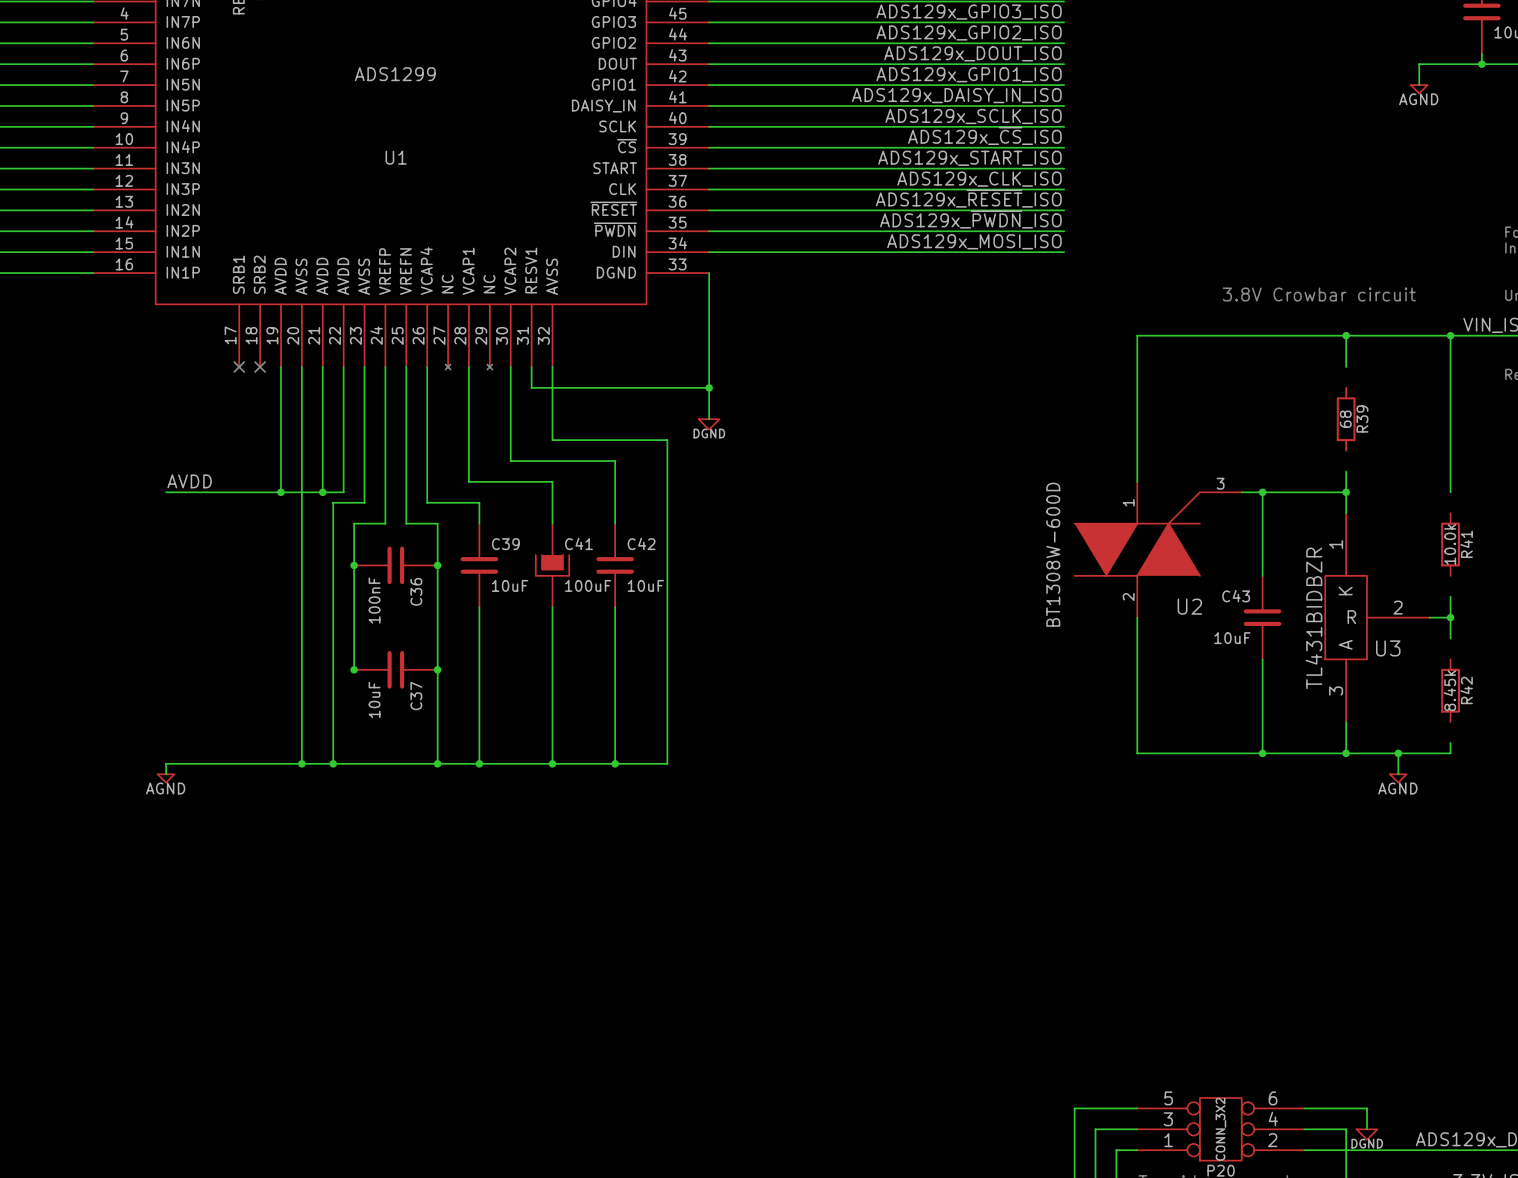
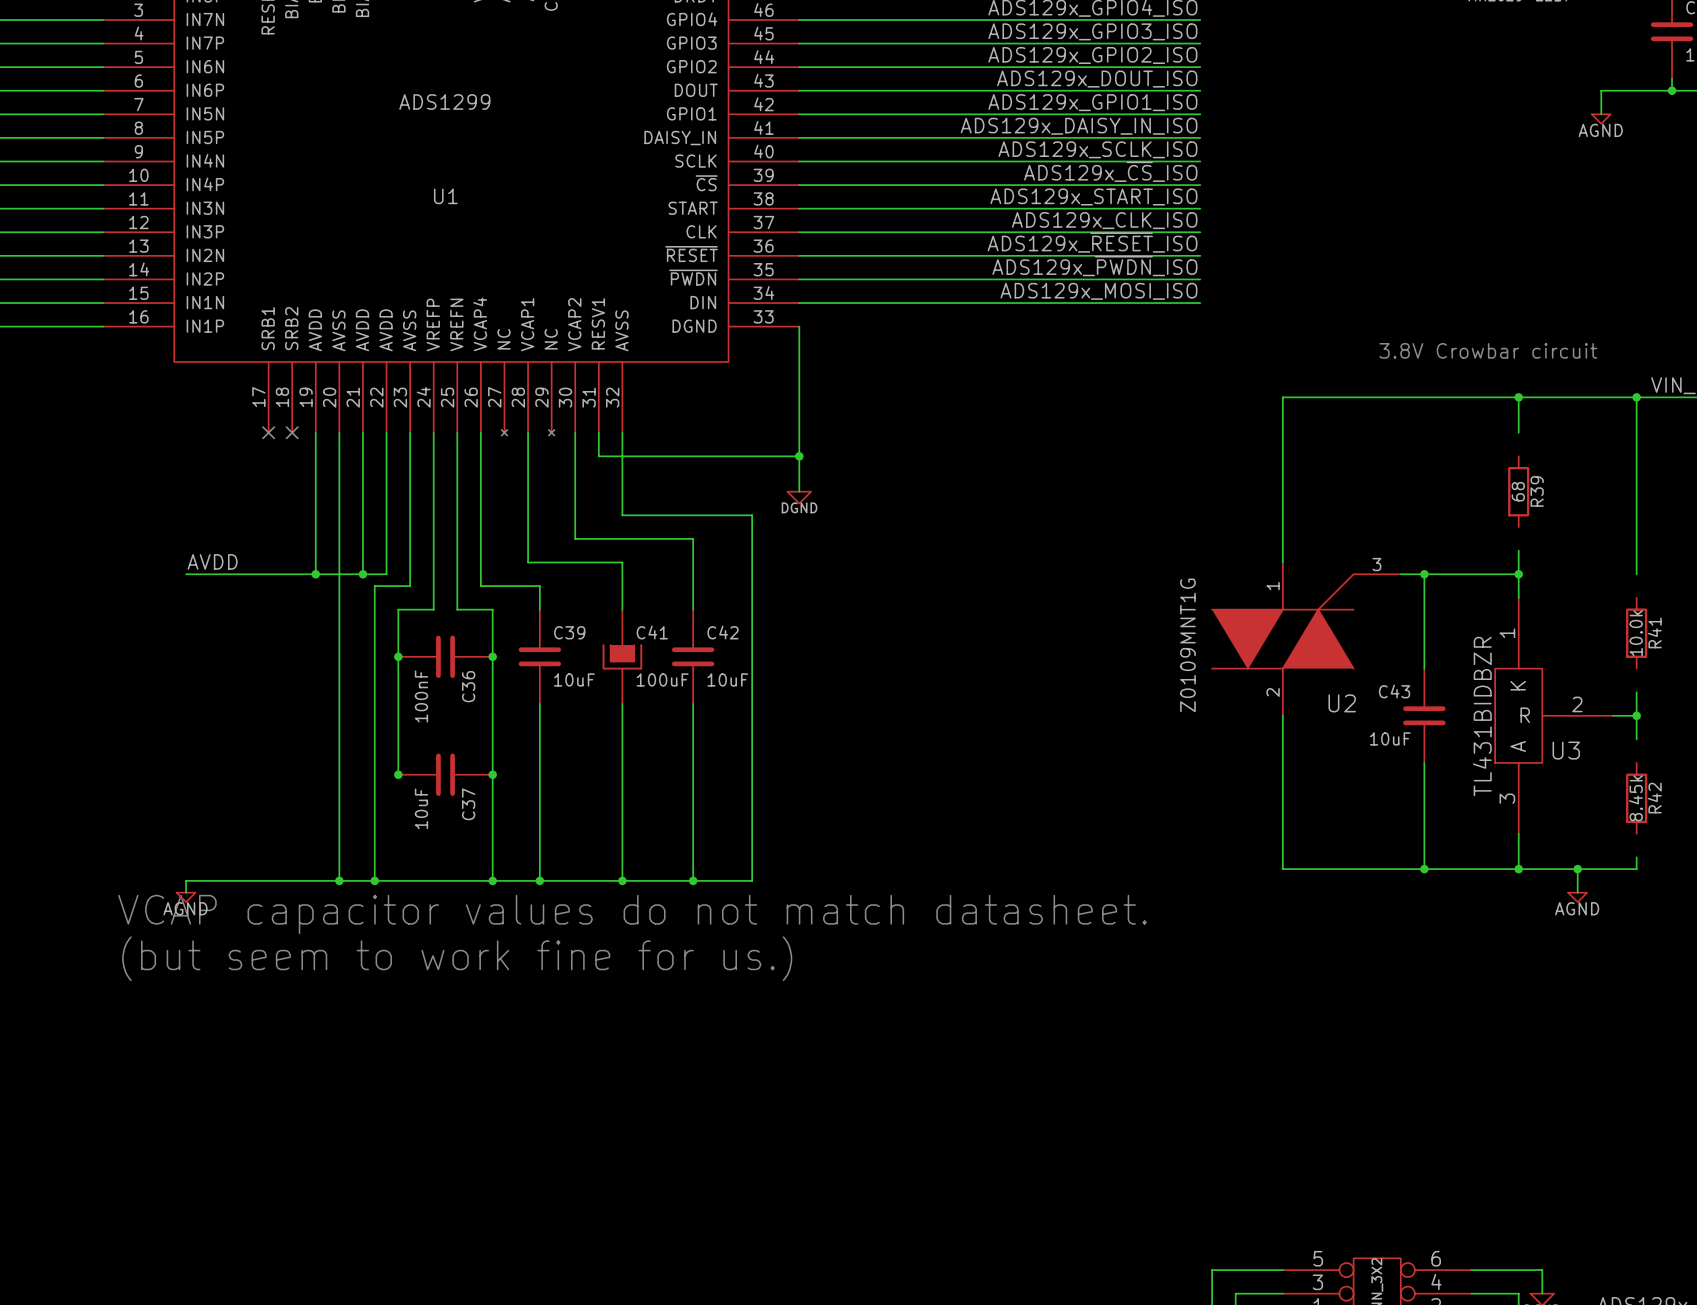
U2 value: BT1308W-600D (1053, 554) -> Z0109MNT1G (1187, 645)
text: none -> VCAP capacitor values do not match datasheet. (632, 914)
text: none -> (but seem to work fine for us.) (457, 958)

